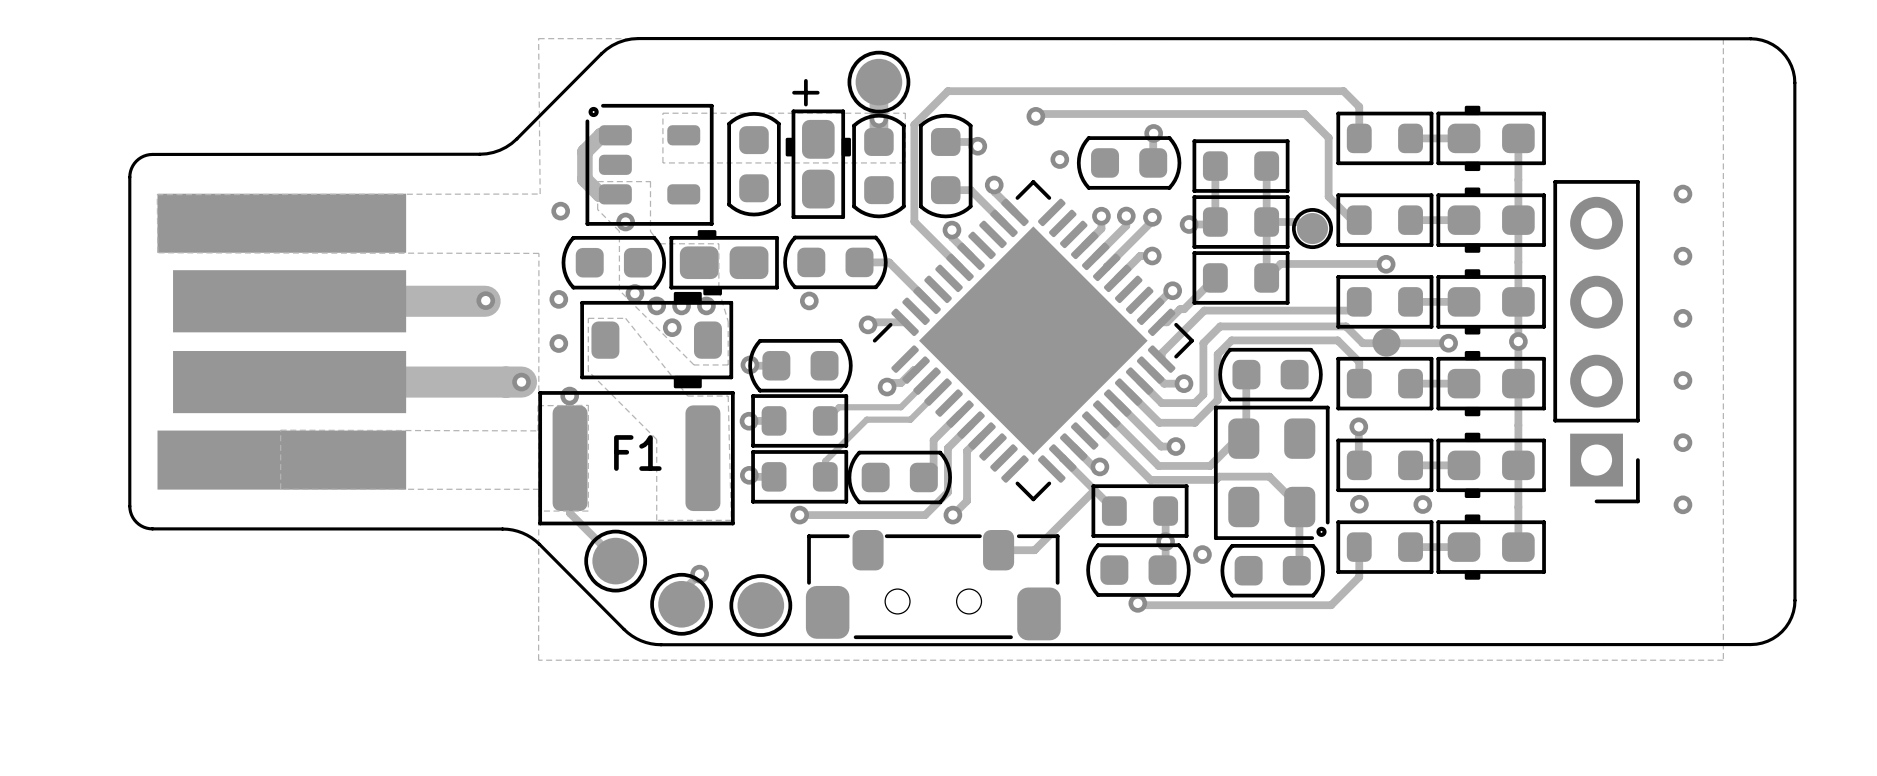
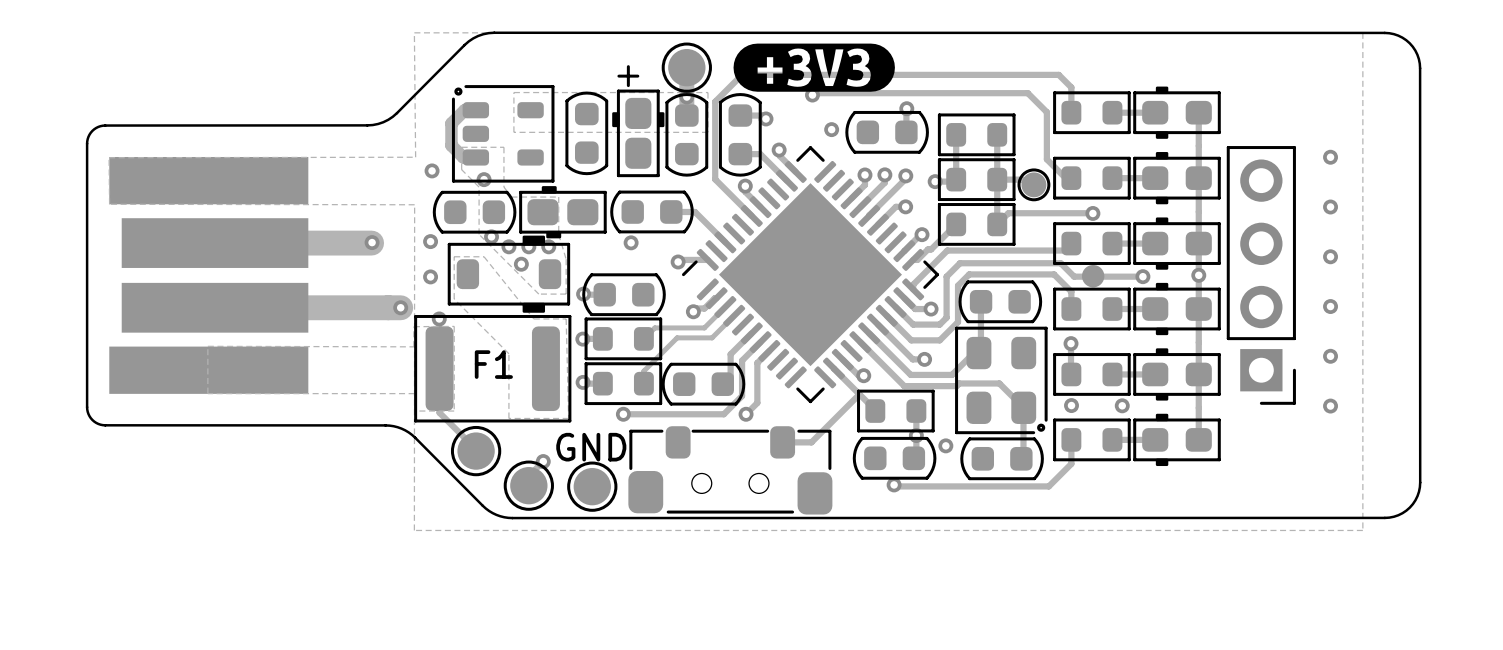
drawing: none -> [733, 43, 895, 92]
text: none -> GND (591, 447)

